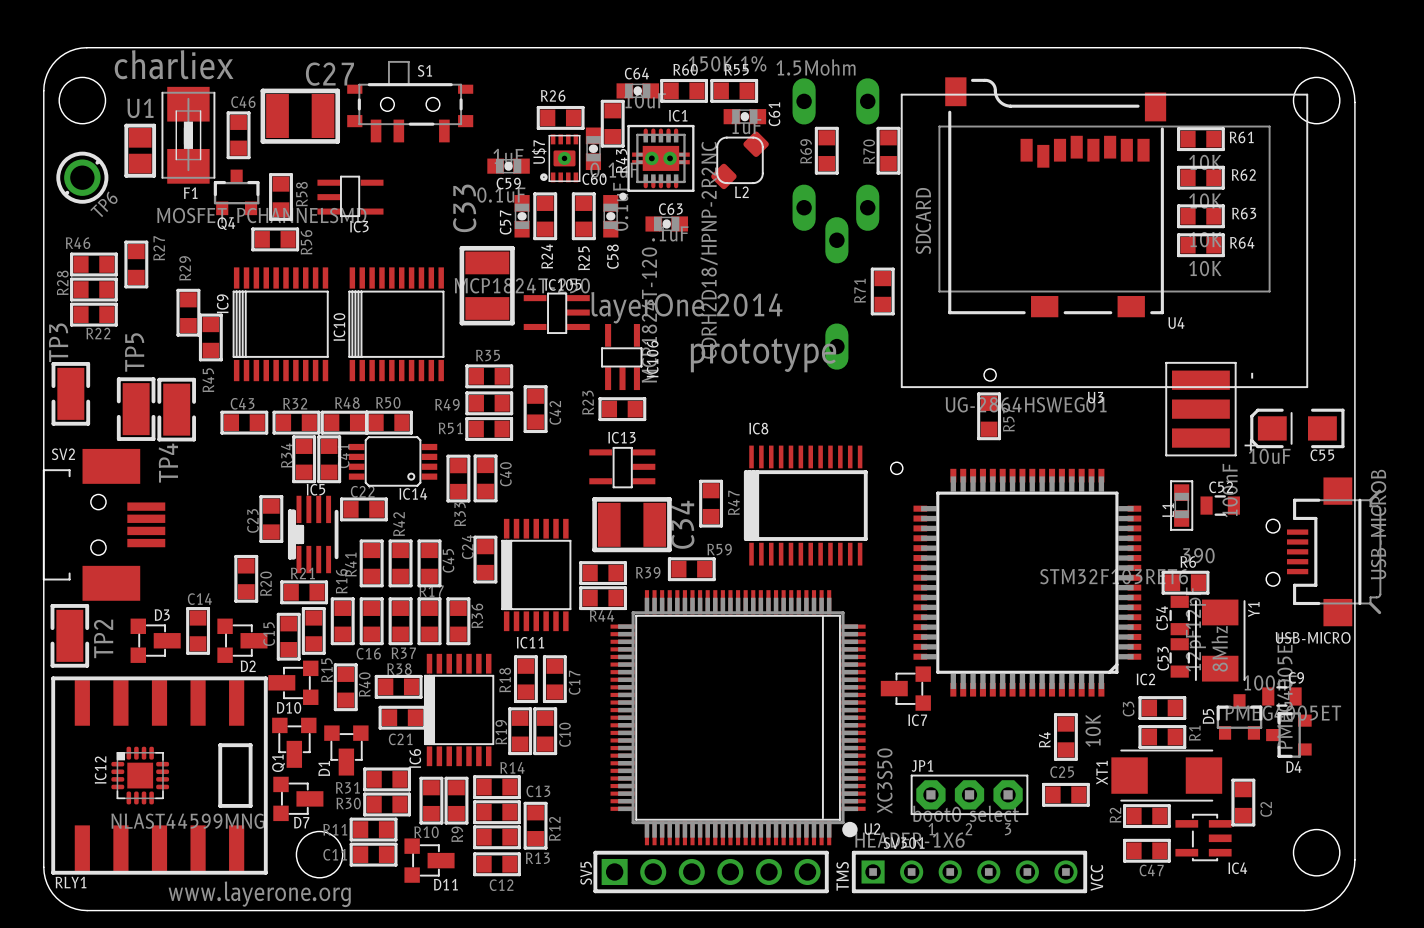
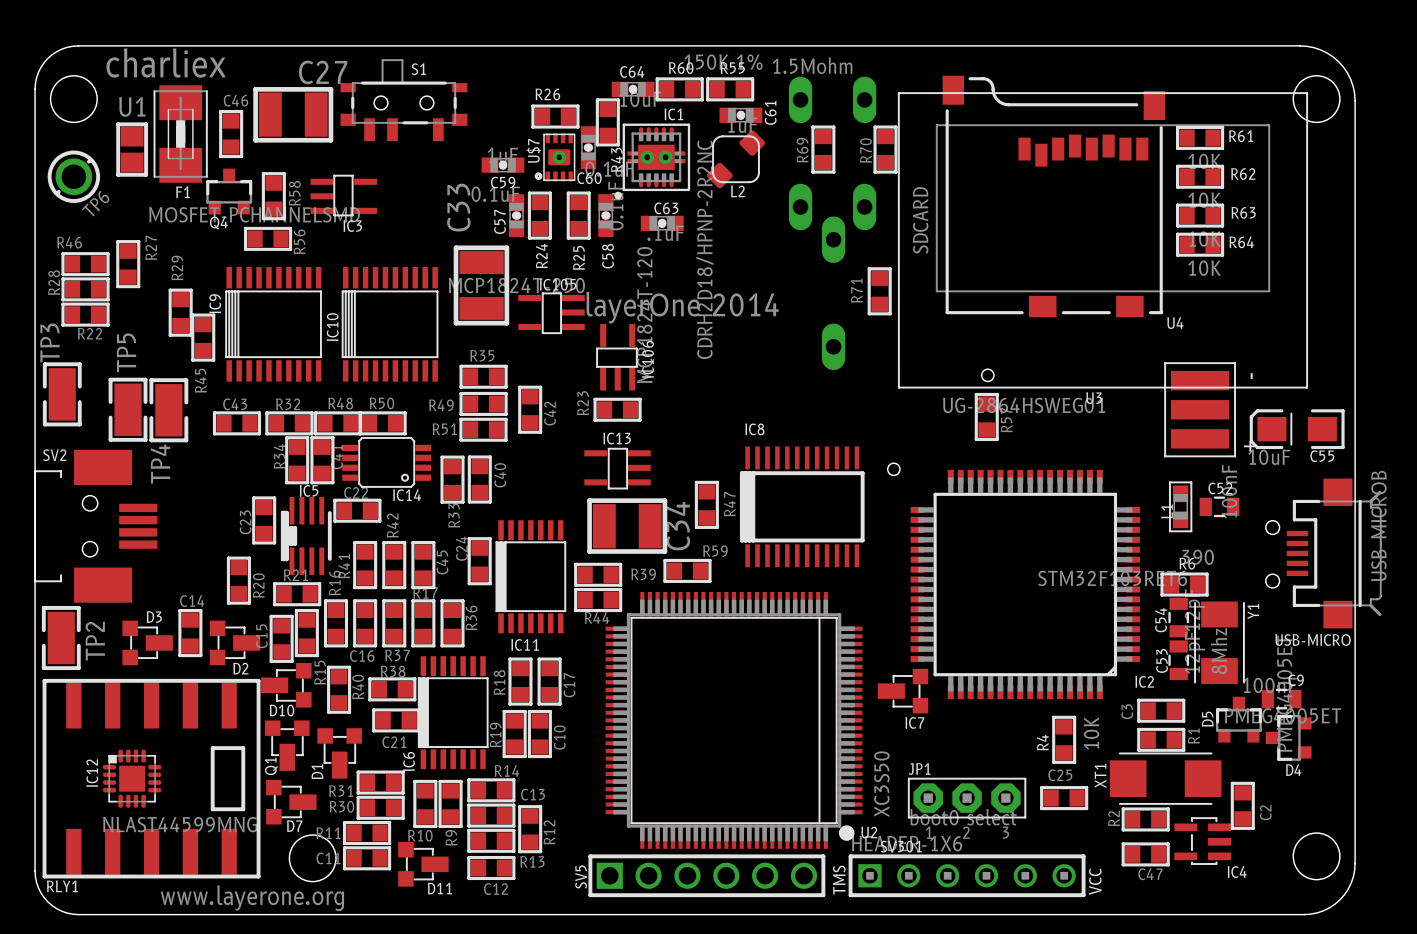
text: prototype (763, 355) -> none

